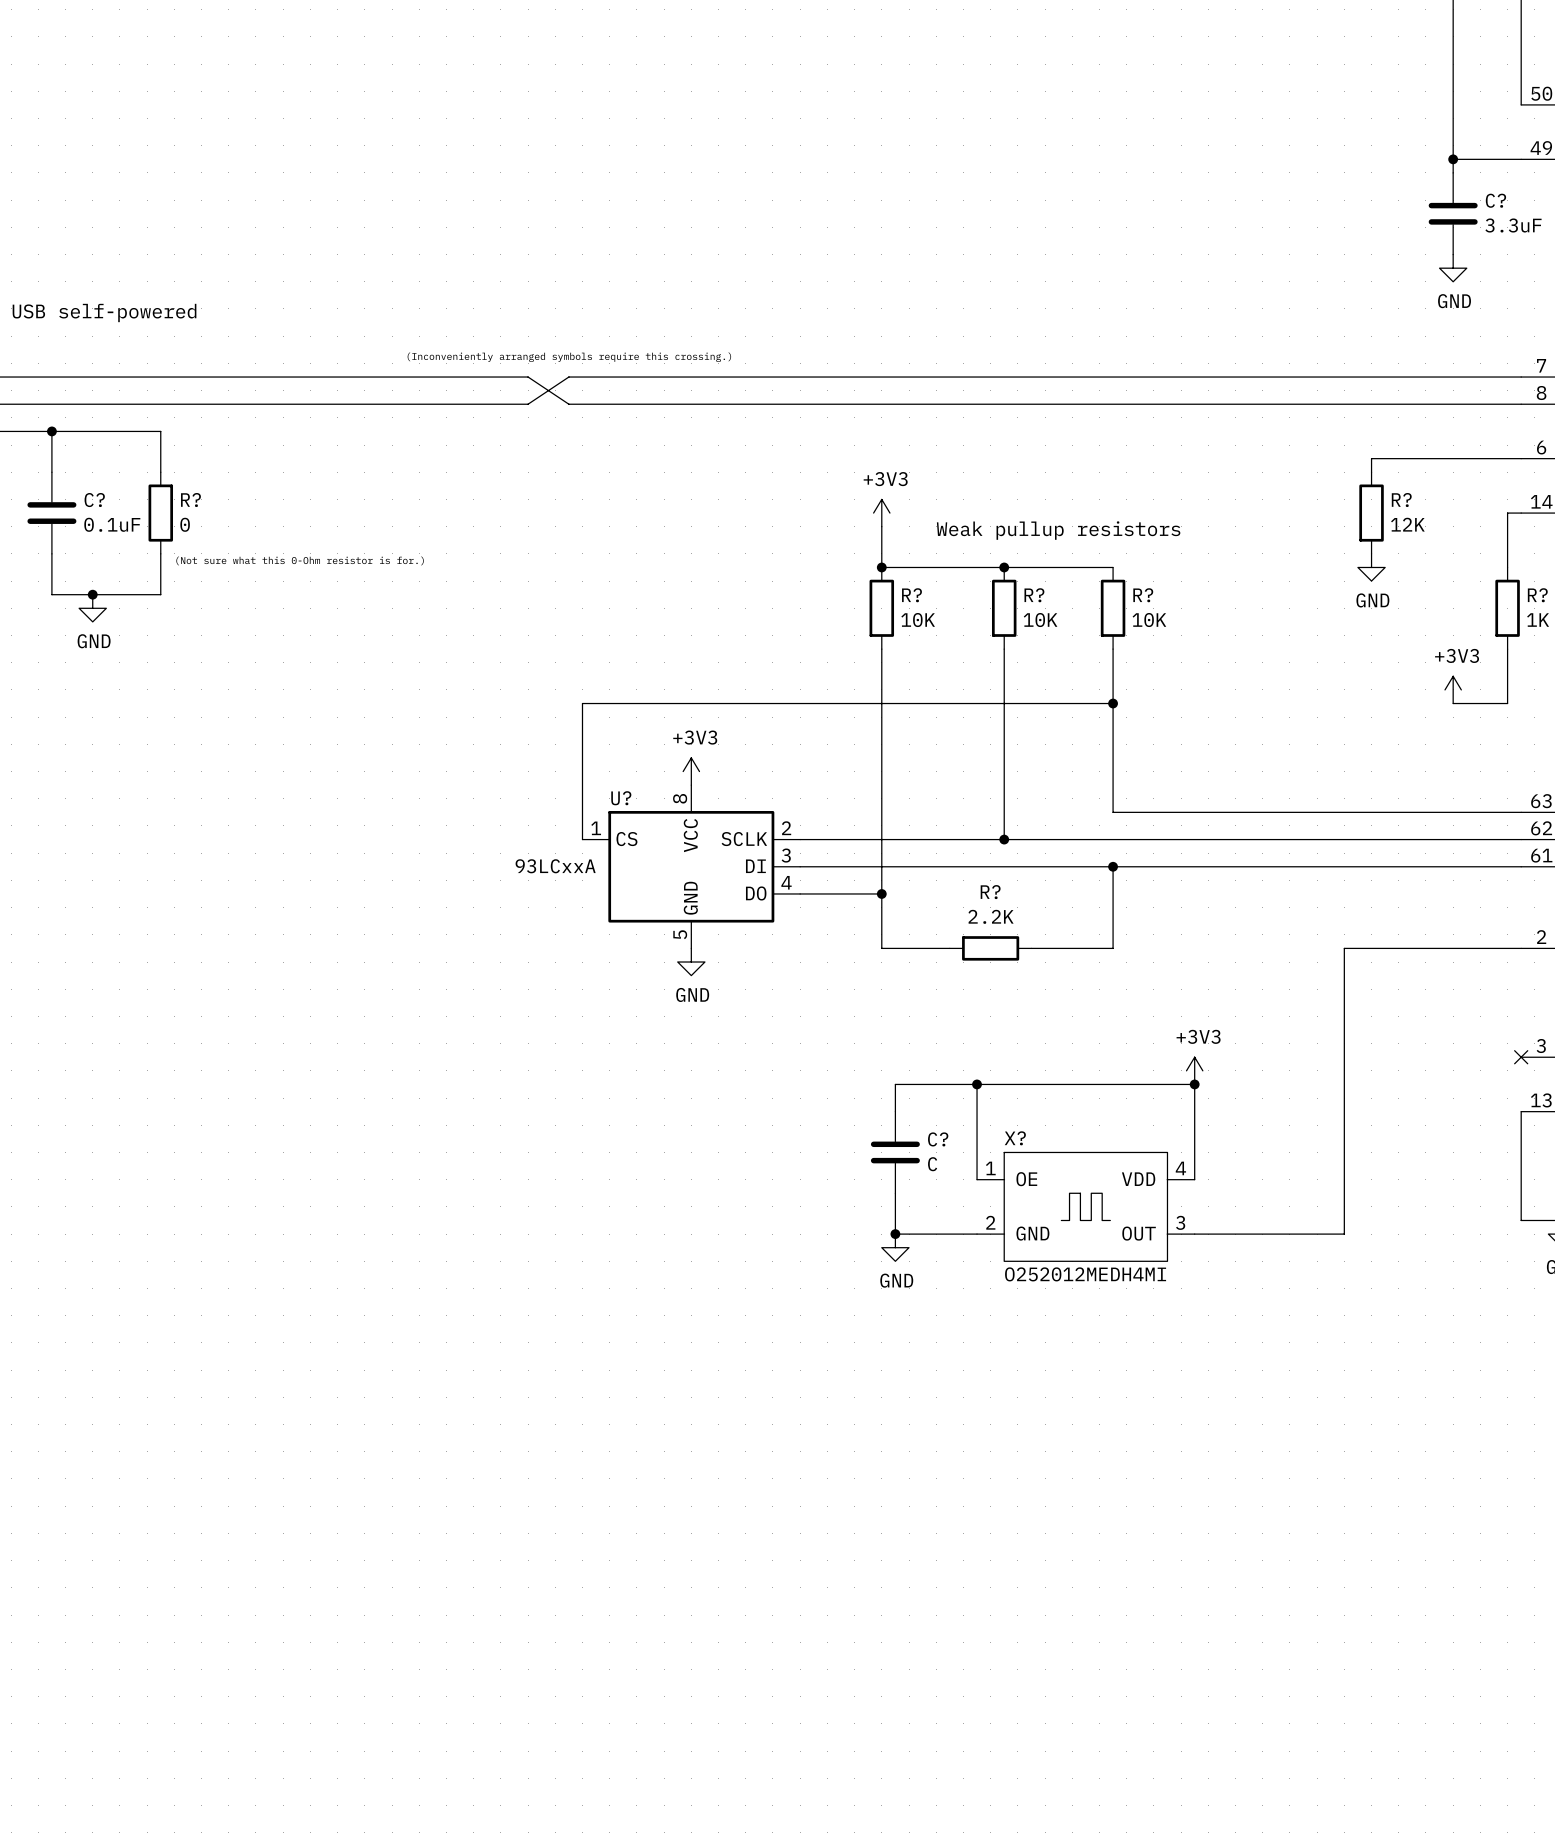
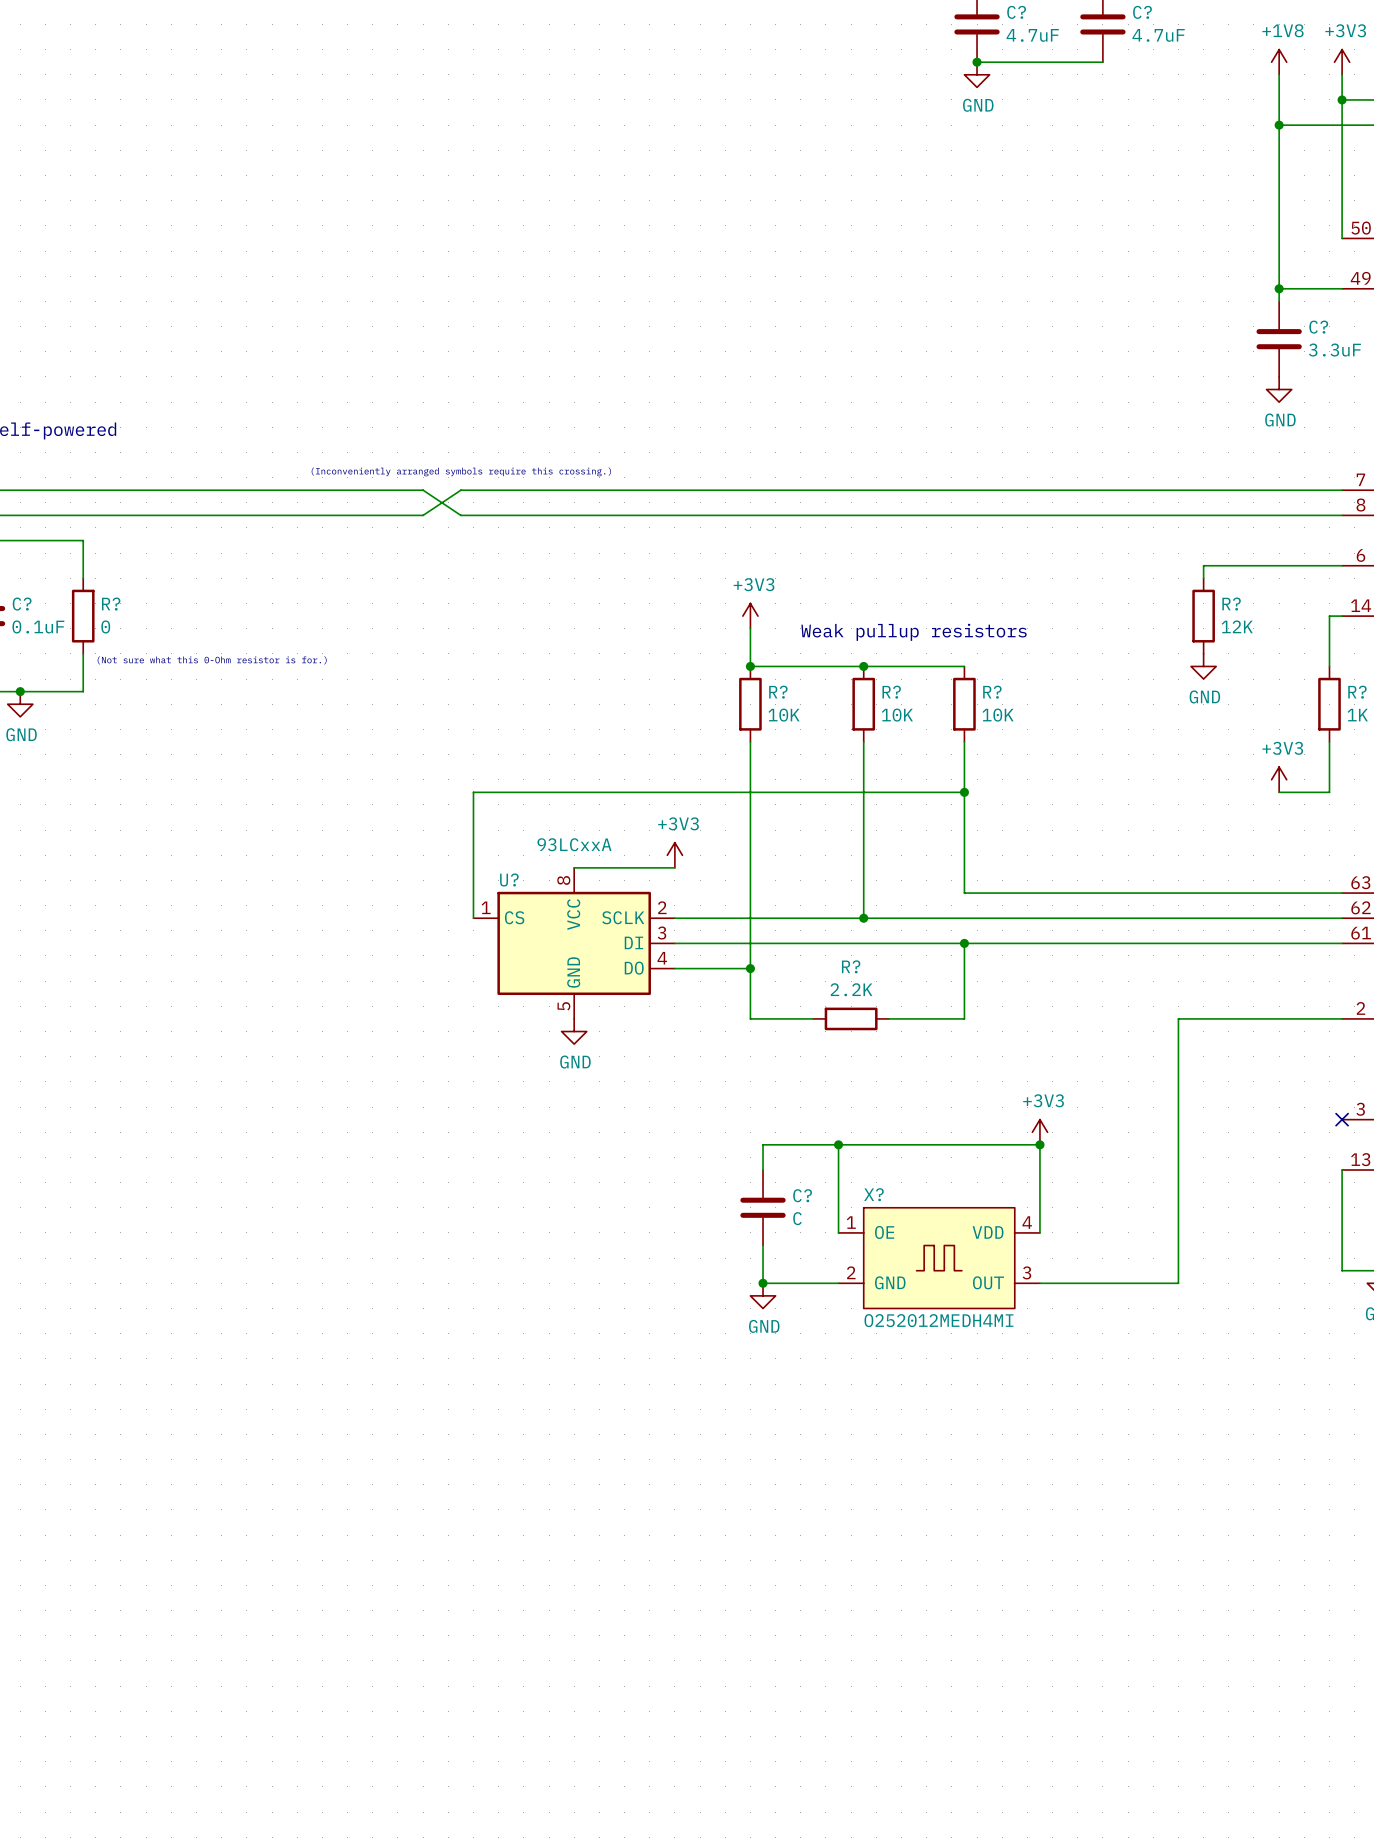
power symbol position: +3V3 (691, 771) -> +3V3 (674, 855)
wire: none -> (574, 867) (674, 867)
U? value position: 93LCxxA (555, 866) -> 93LCxxA (574, 844)

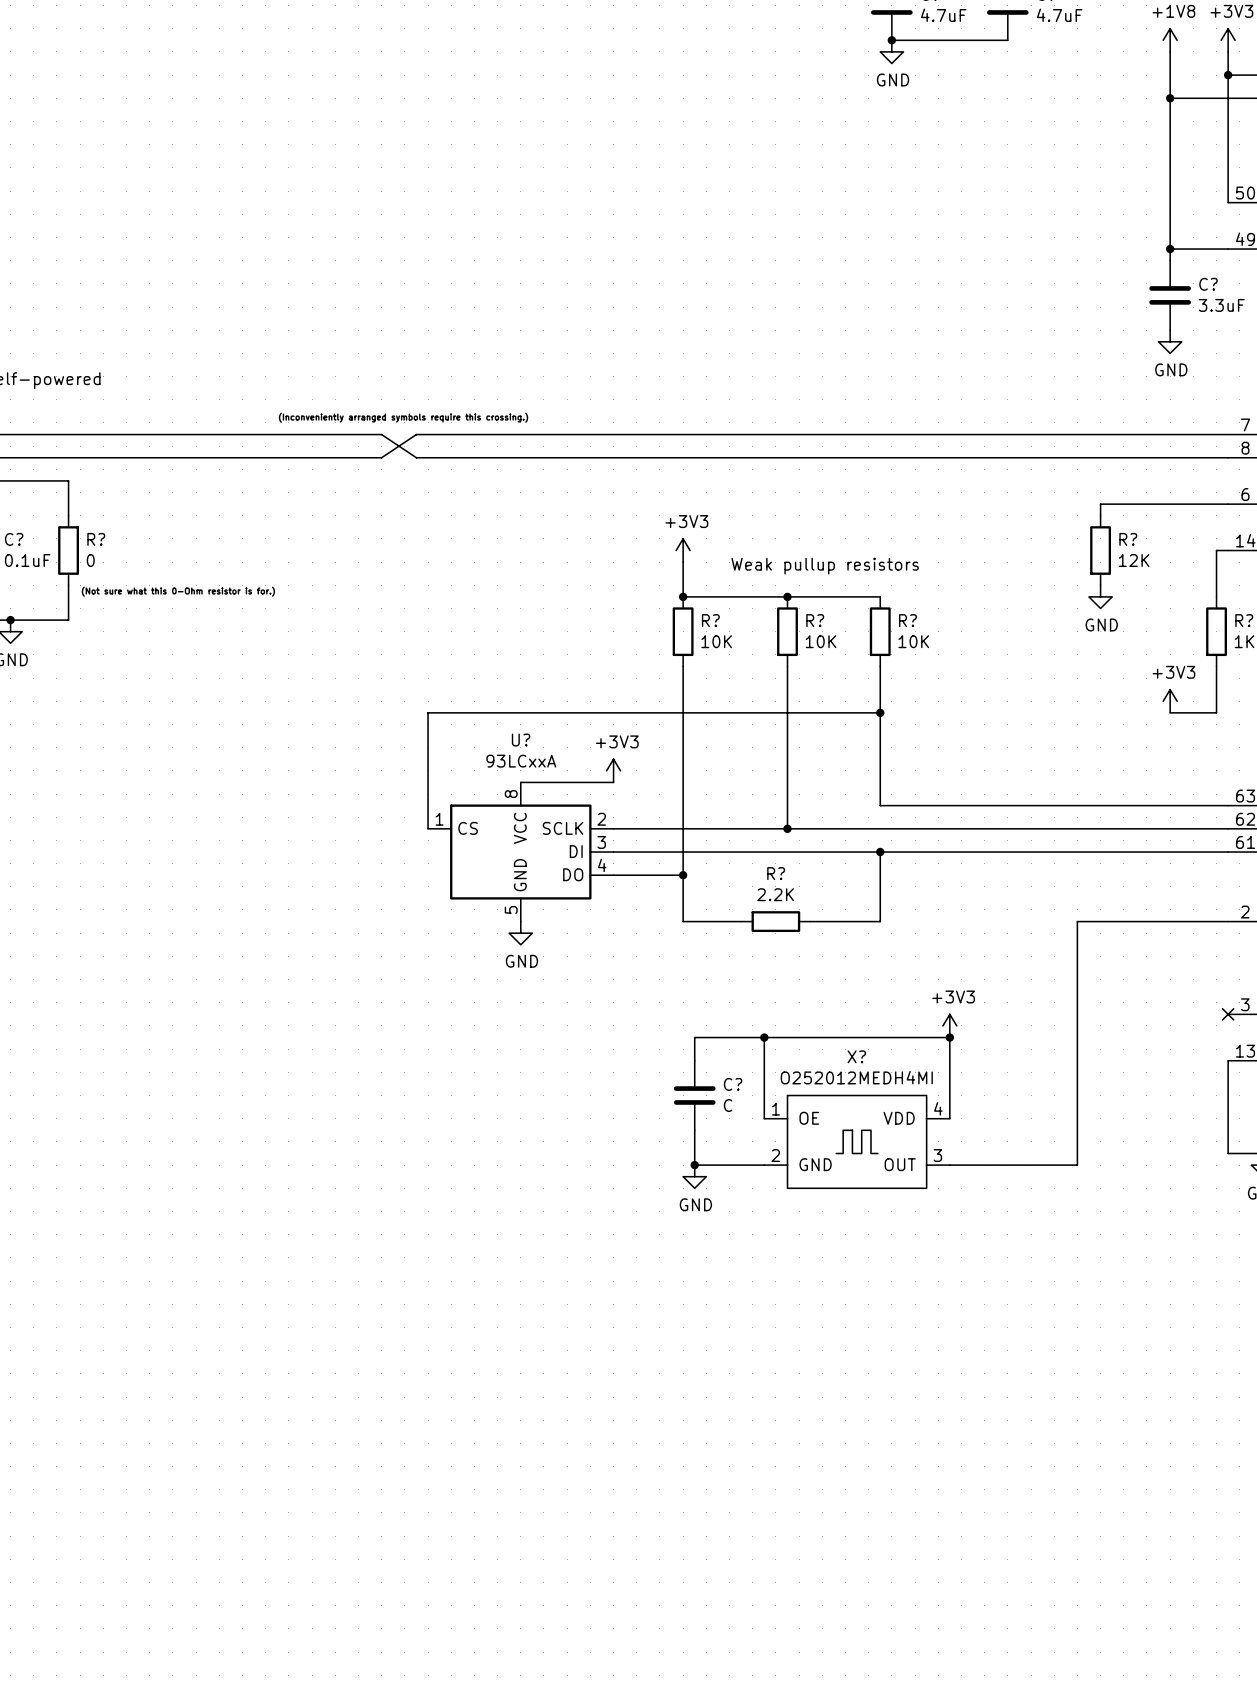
U? name position: U? (509, 879) -> U? (521, 740)
X? name position: X? (873, 1194) -> X? (856, 1056)
X? value position: O252012MEDH4MI (939, 1320) -> O252012MEDH4MI (856, 1077)

